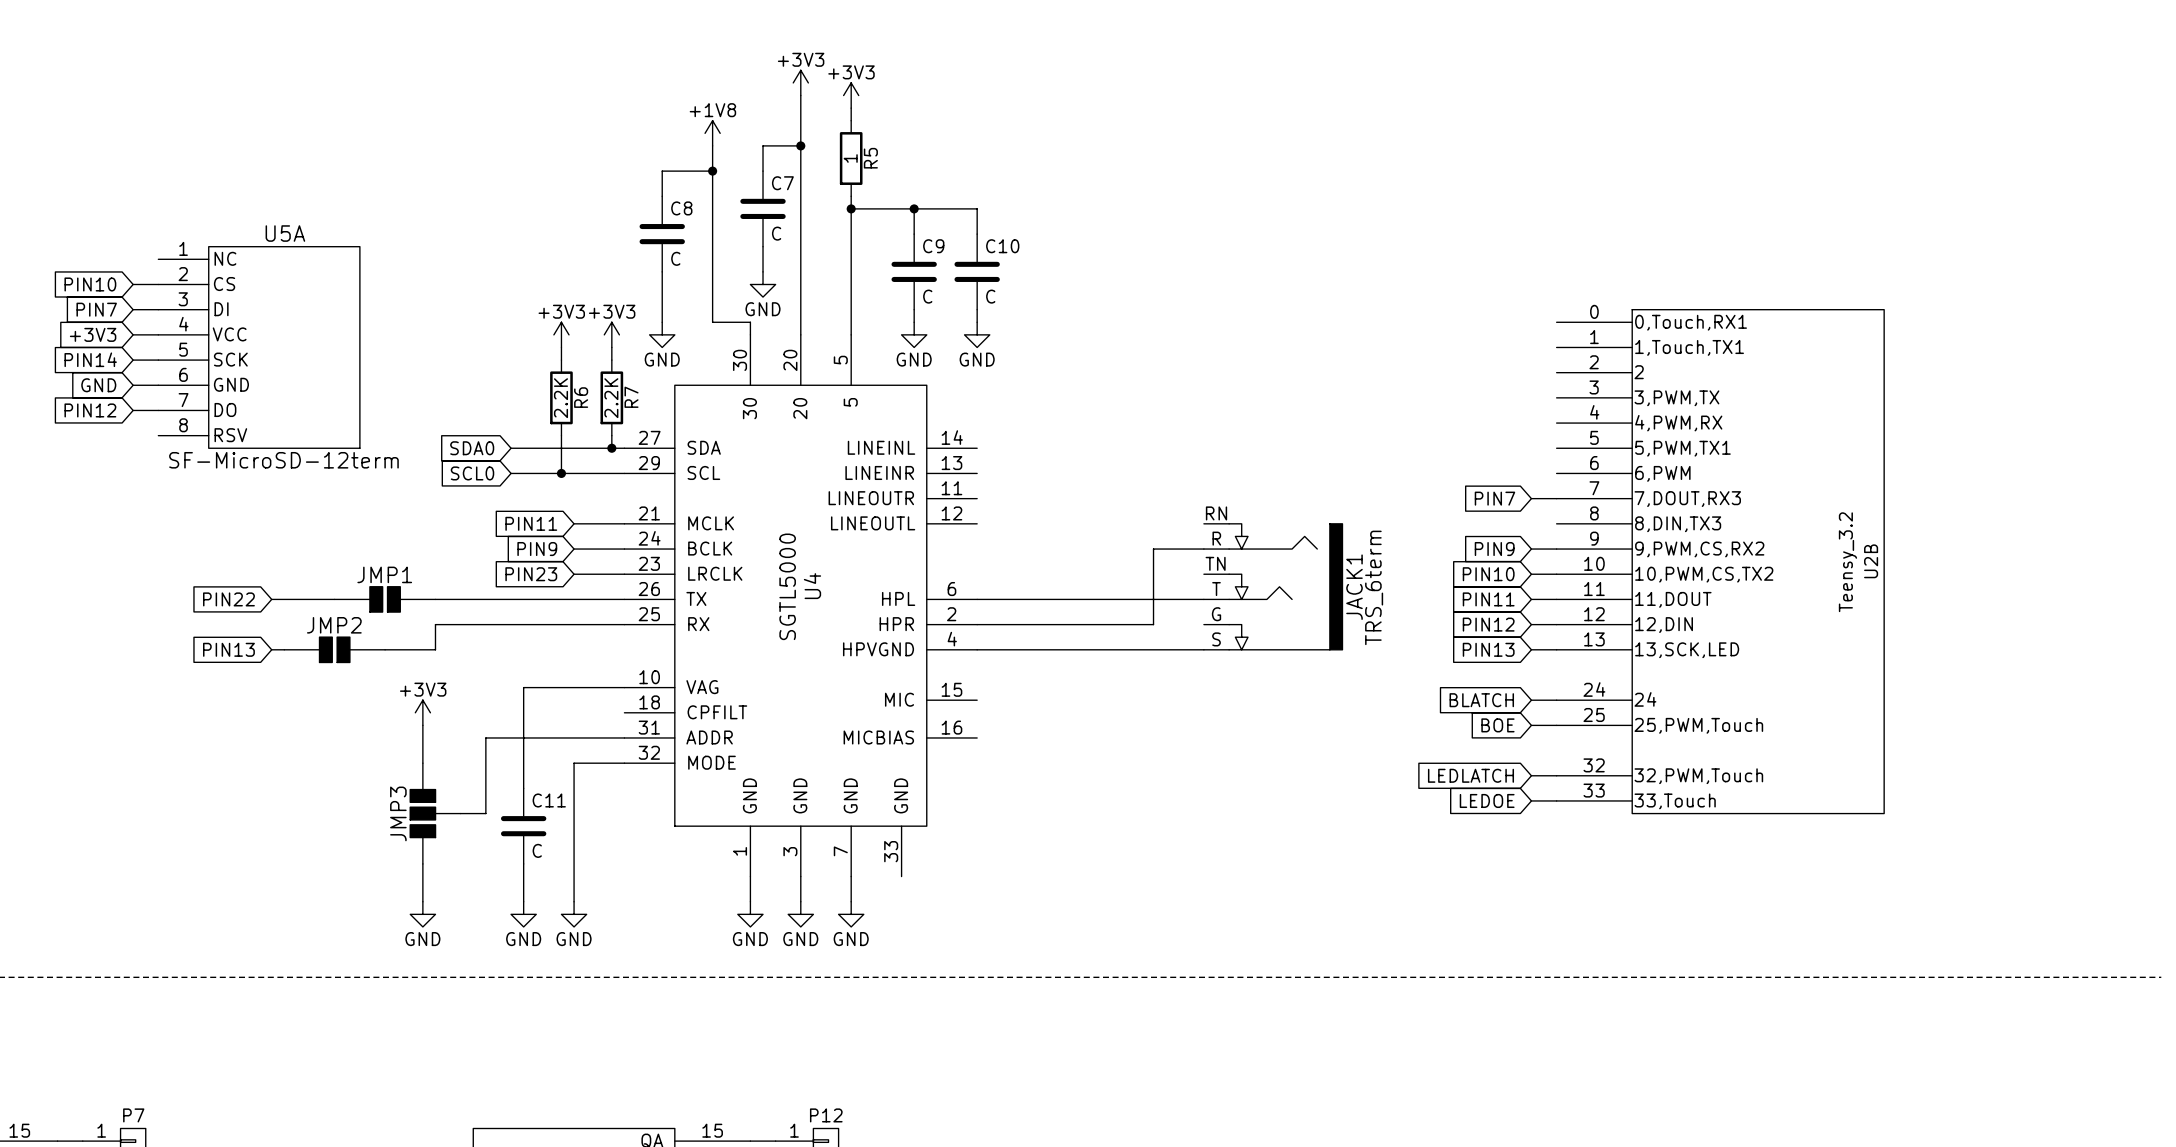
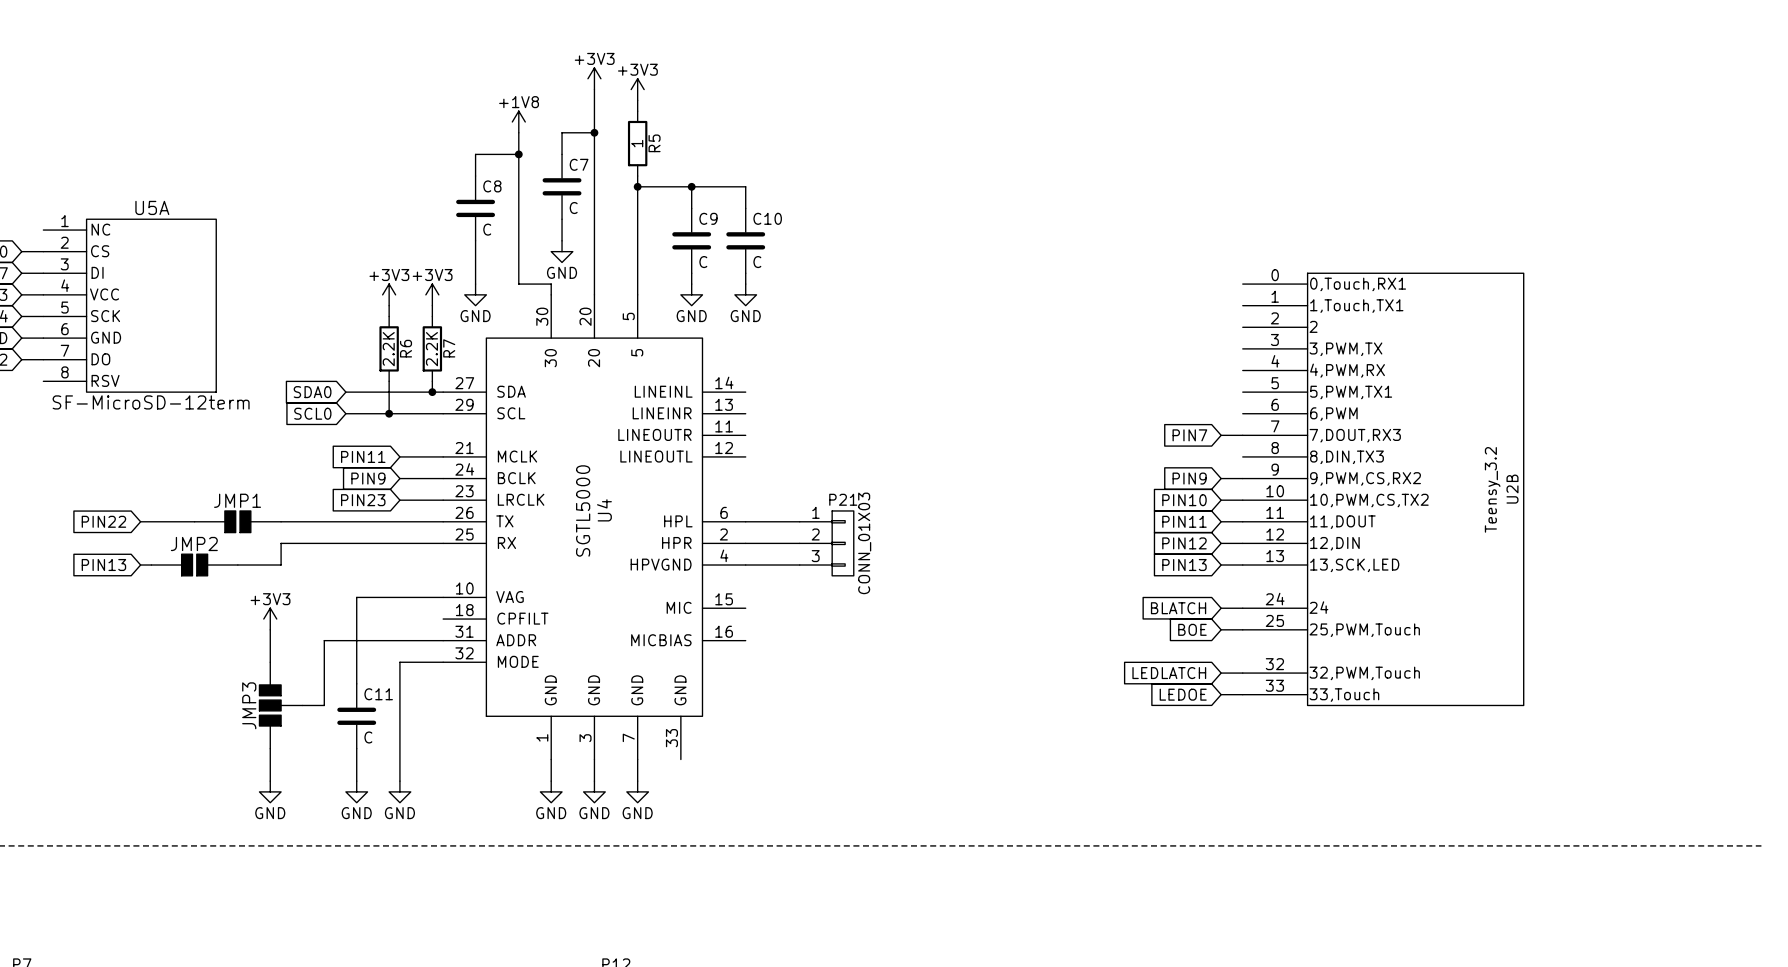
wire: (1203, 549) (1153, 549) (1153, 624) (1040, 624) -> none
JACK1: TRS_6term (1273, 586) -> none
wire: (1040, 599) (1203, 599) -> none
P21: none -> CONN_01X03 (826, 543)
wire: (1040, 649) (1203, 649) -> none

